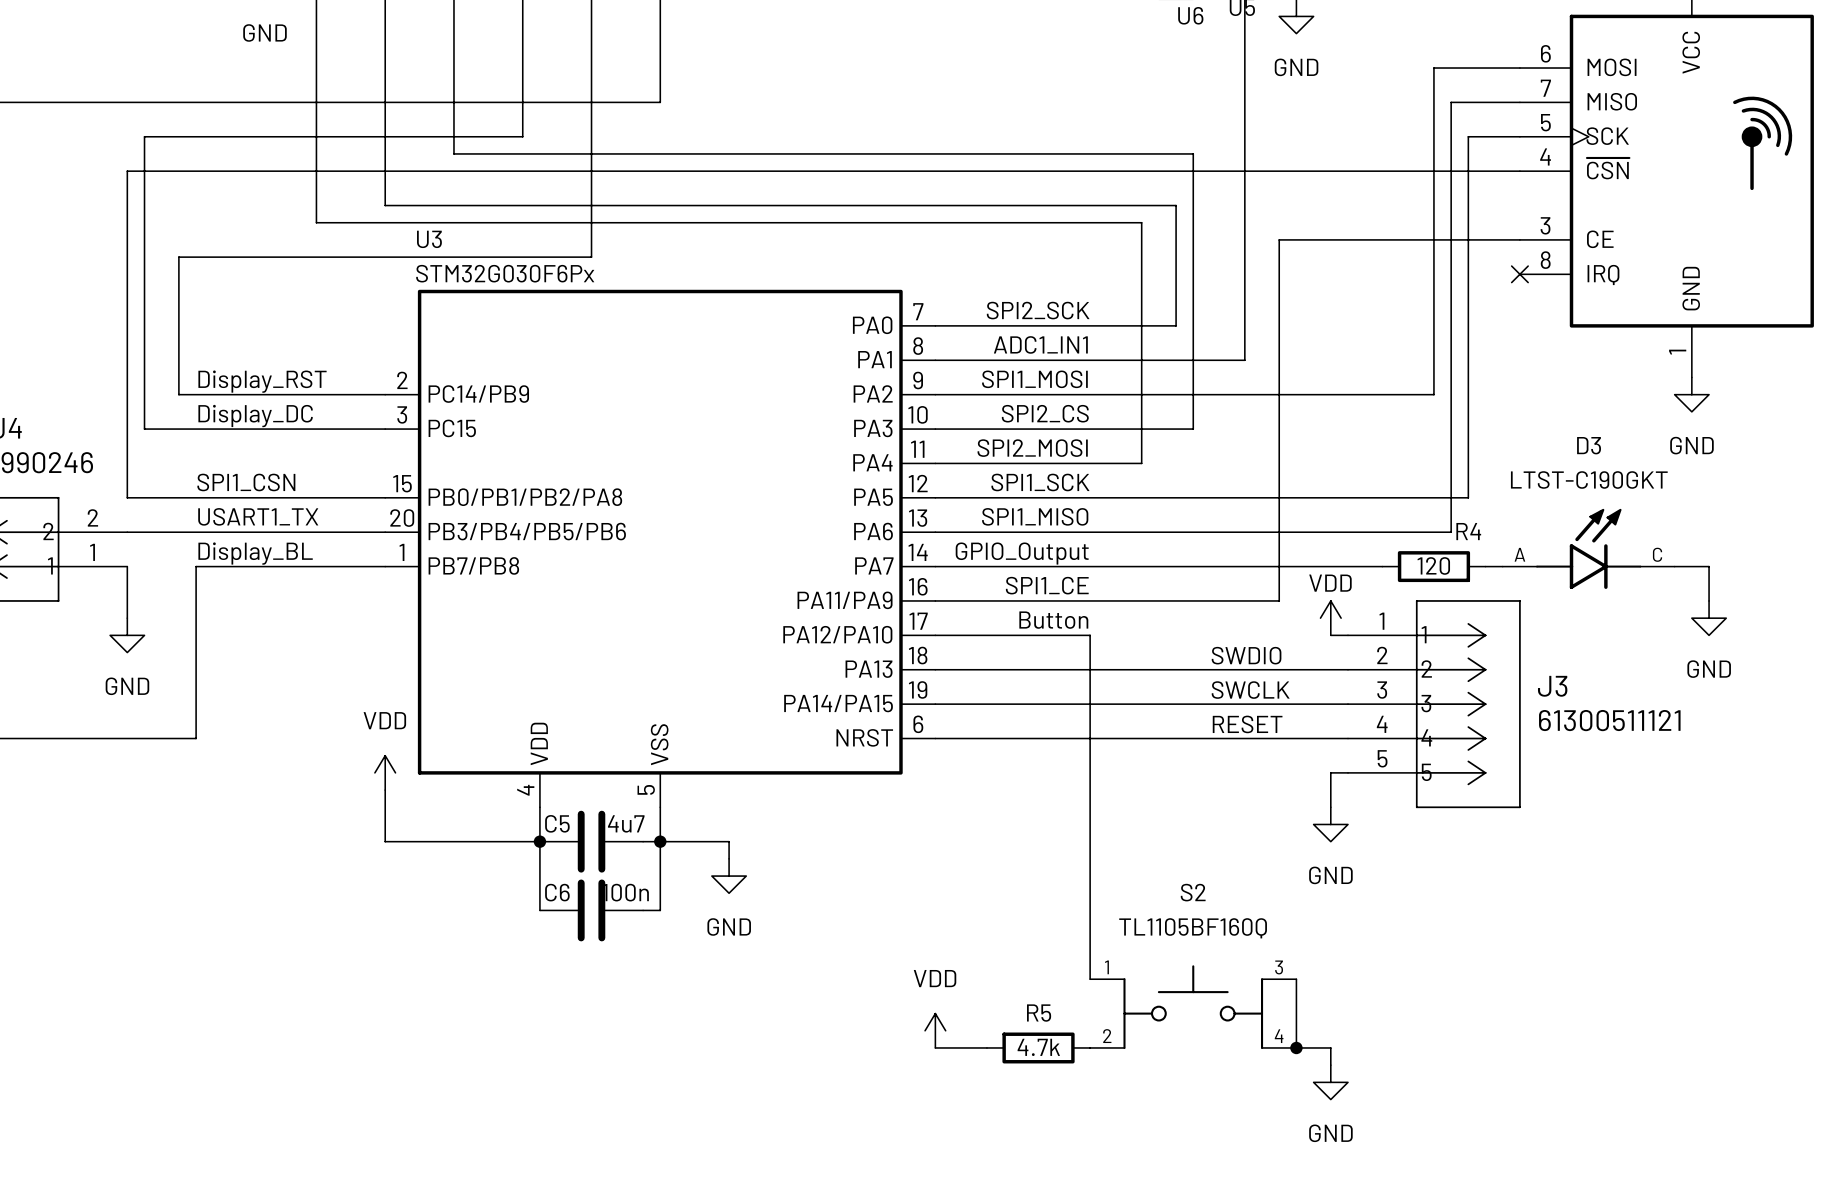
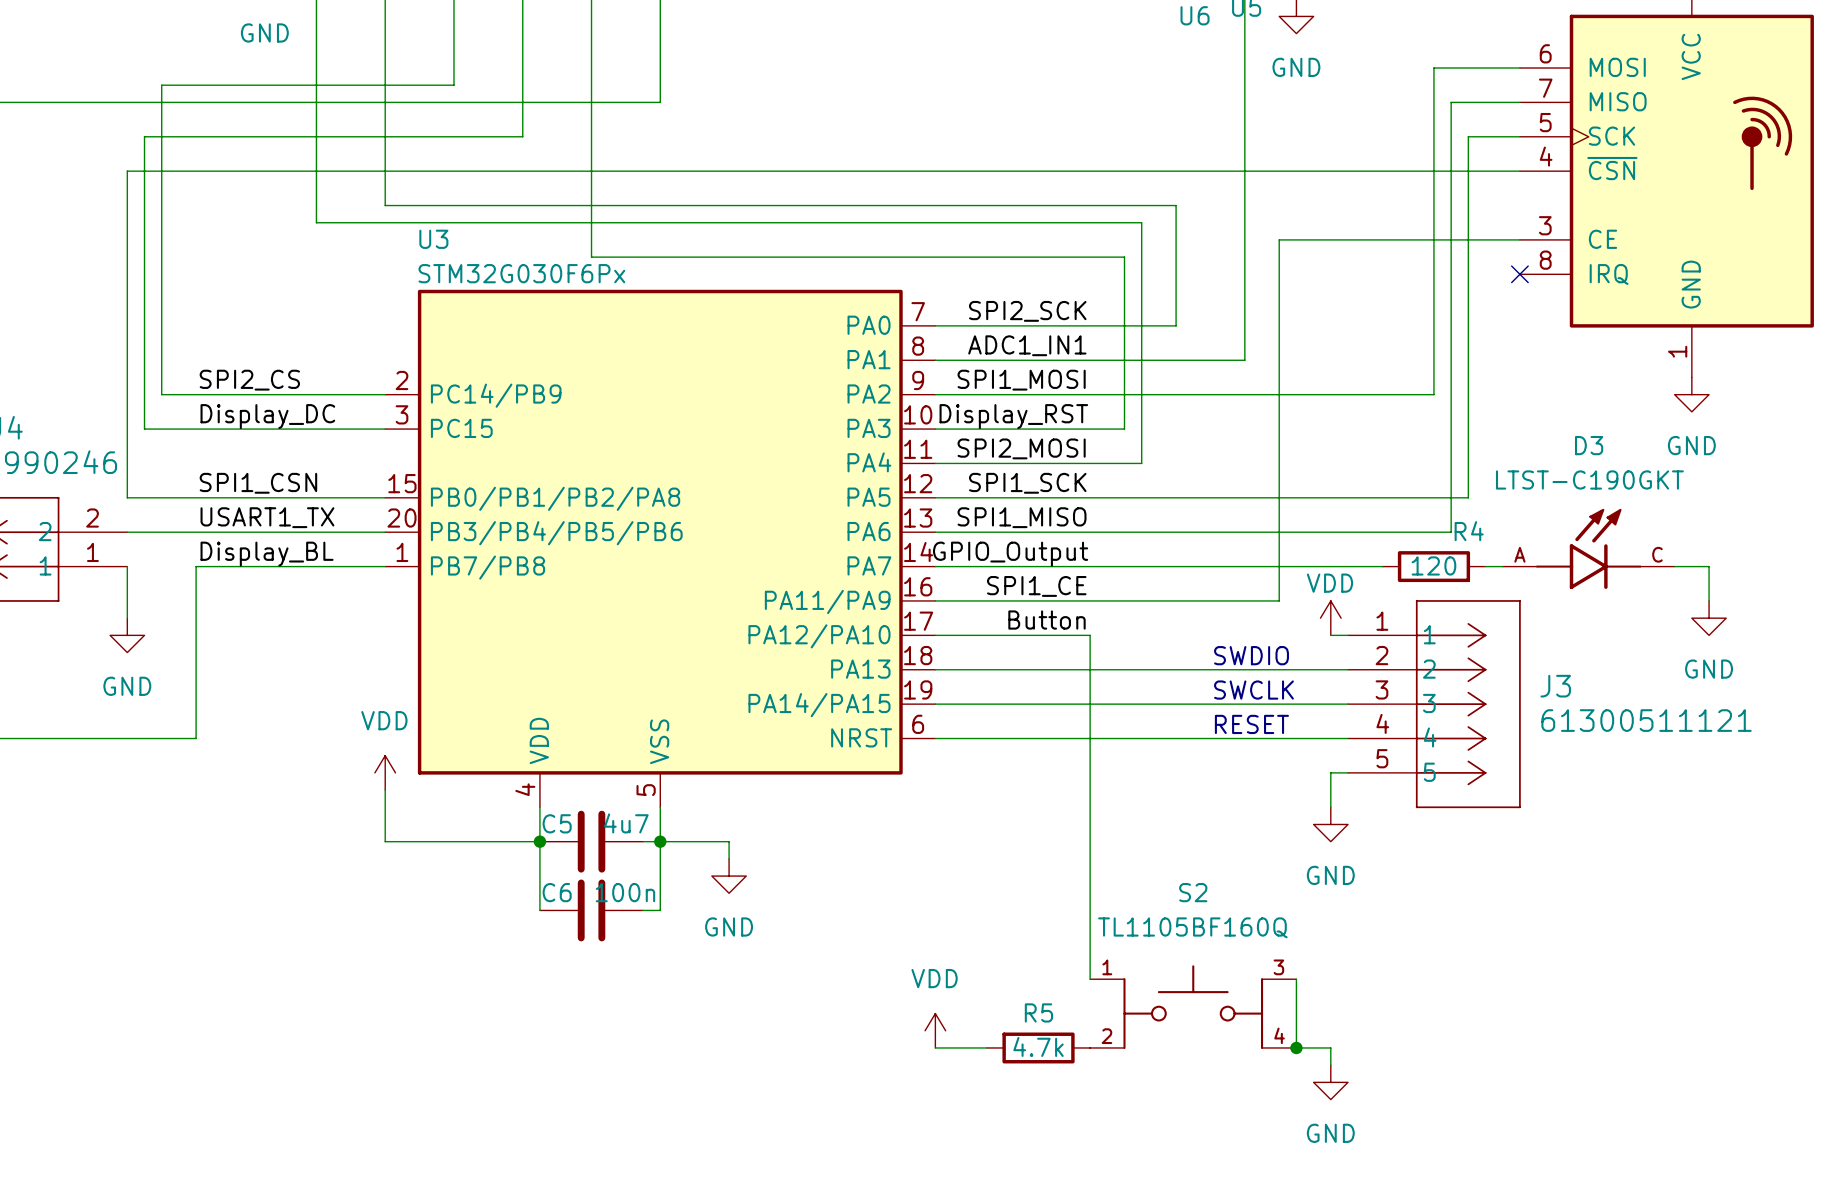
wire: (453, 85) (453, 153) (1193, 153) (1193, 429) (1124, 429) -> (591, 257) (1124, 257) (1124, 429)
wire: (591, 257) (178, 257) (178, 394) -> (453, 85) (161, 85) (161, 394) (178, 394)
label: Display_RST (262, 381) -> SPI2_CS (249, 380)
label: SPI2_CS (1045, 413) -> Display_RST (1013, 416)

